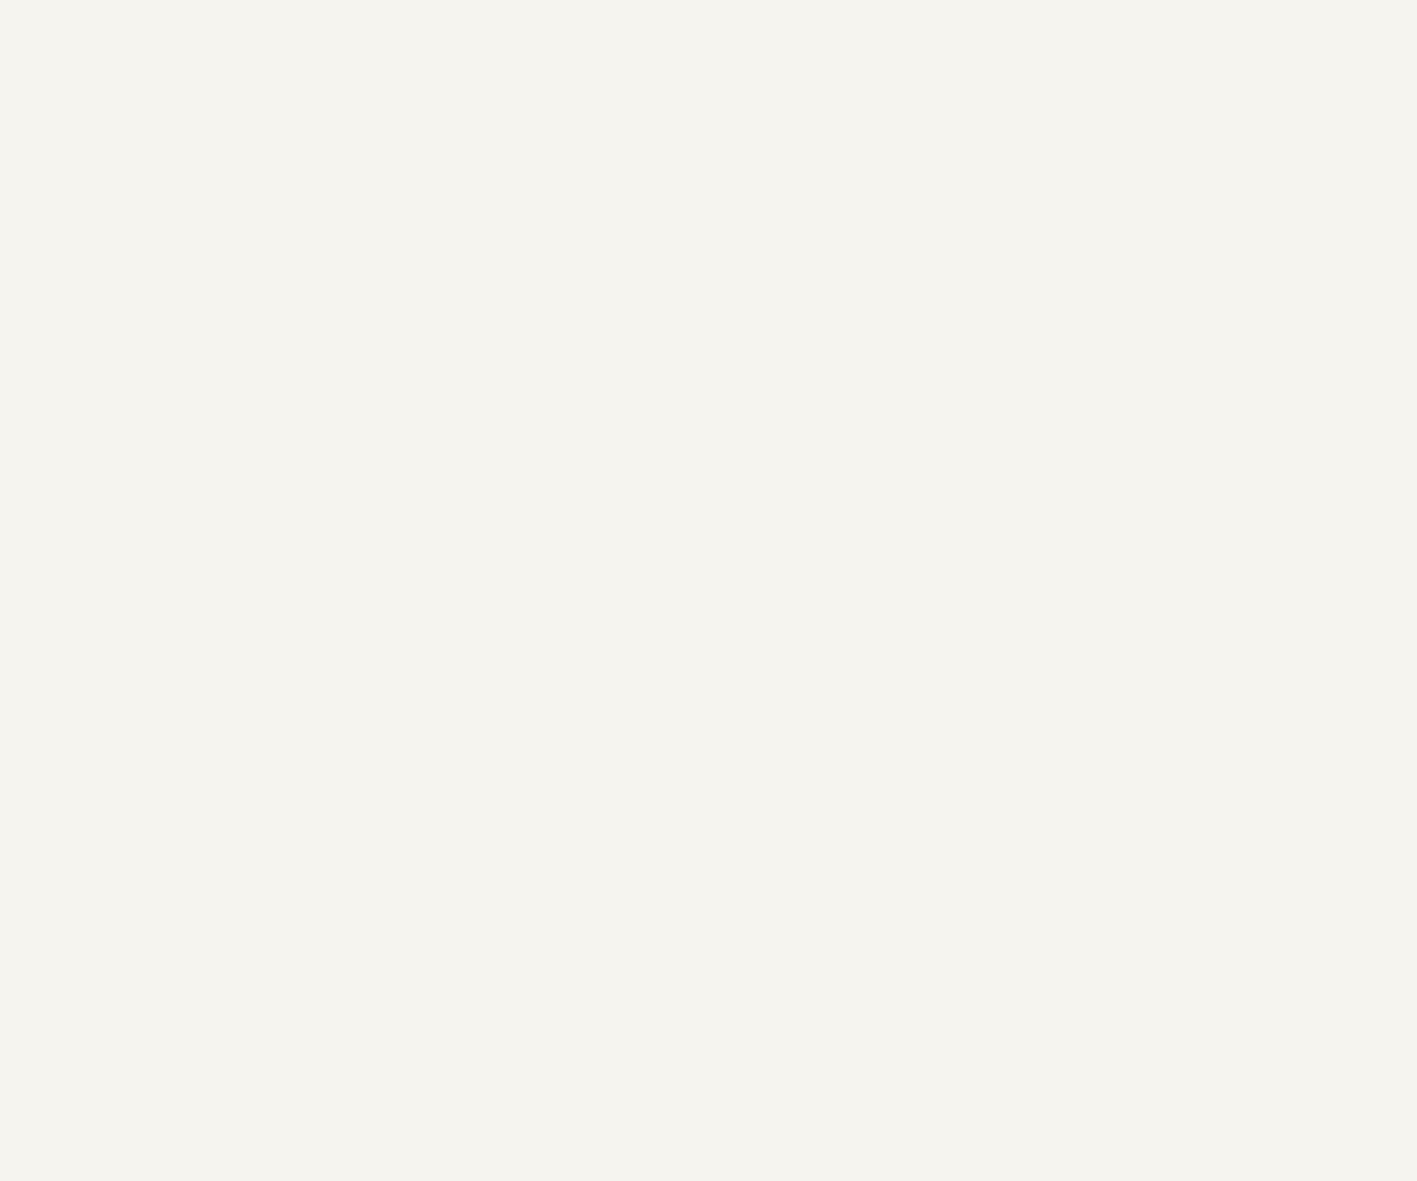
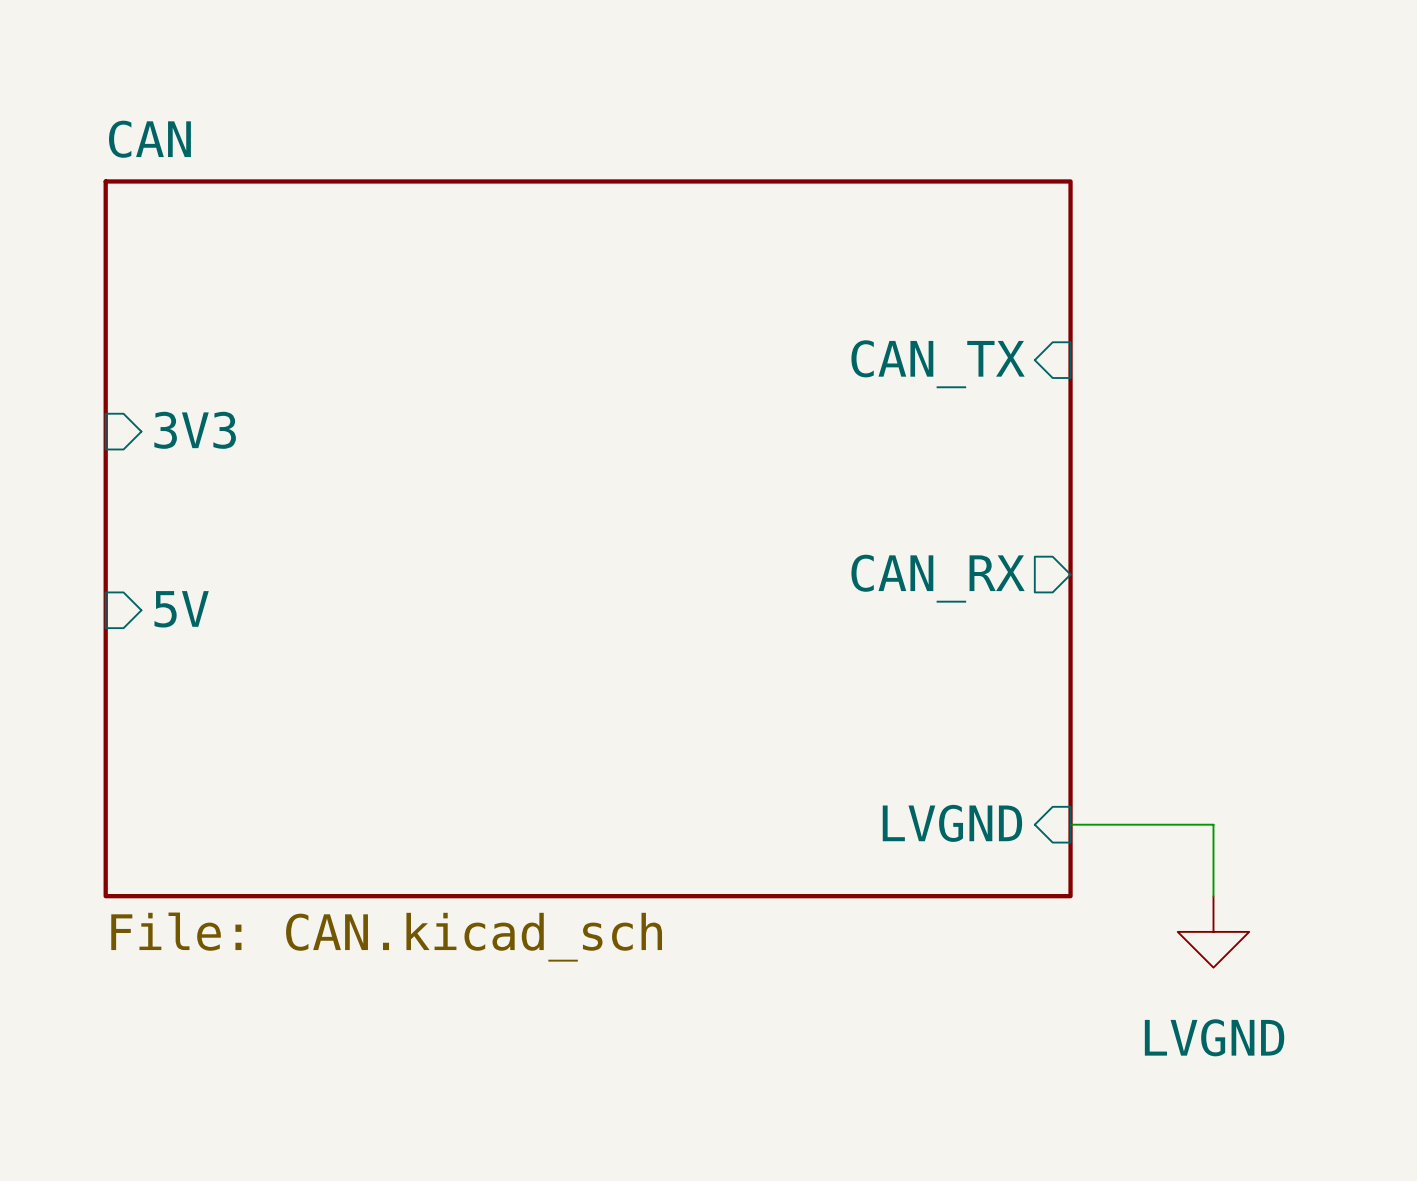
sheet pin: none -> CAN_TX (938, 364)
sheet pin: none -> 3V3 (195, 430)
sheet CAN: none -> File: CAN.kicad_sch (588, 538)
sheet pin: none -> CAN_RX (938, 578)
sheet pin: none -> 5V (181, 609)
sheet pin: none -> LVGND (952, 823)
wire: none -> (1070, 824) (1213, 824) (1213, 896)
power symbol: none -> LVGND (1213, 931)

